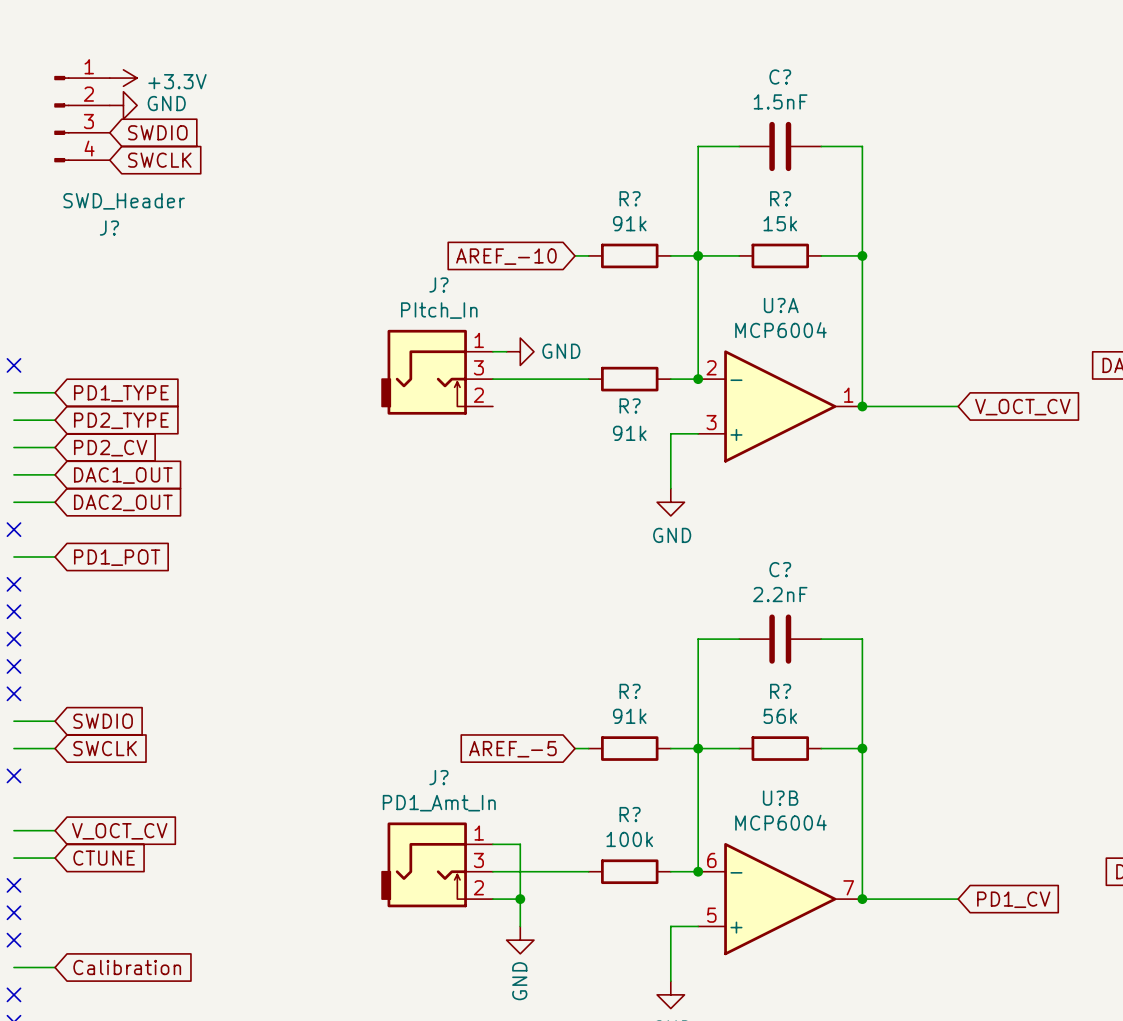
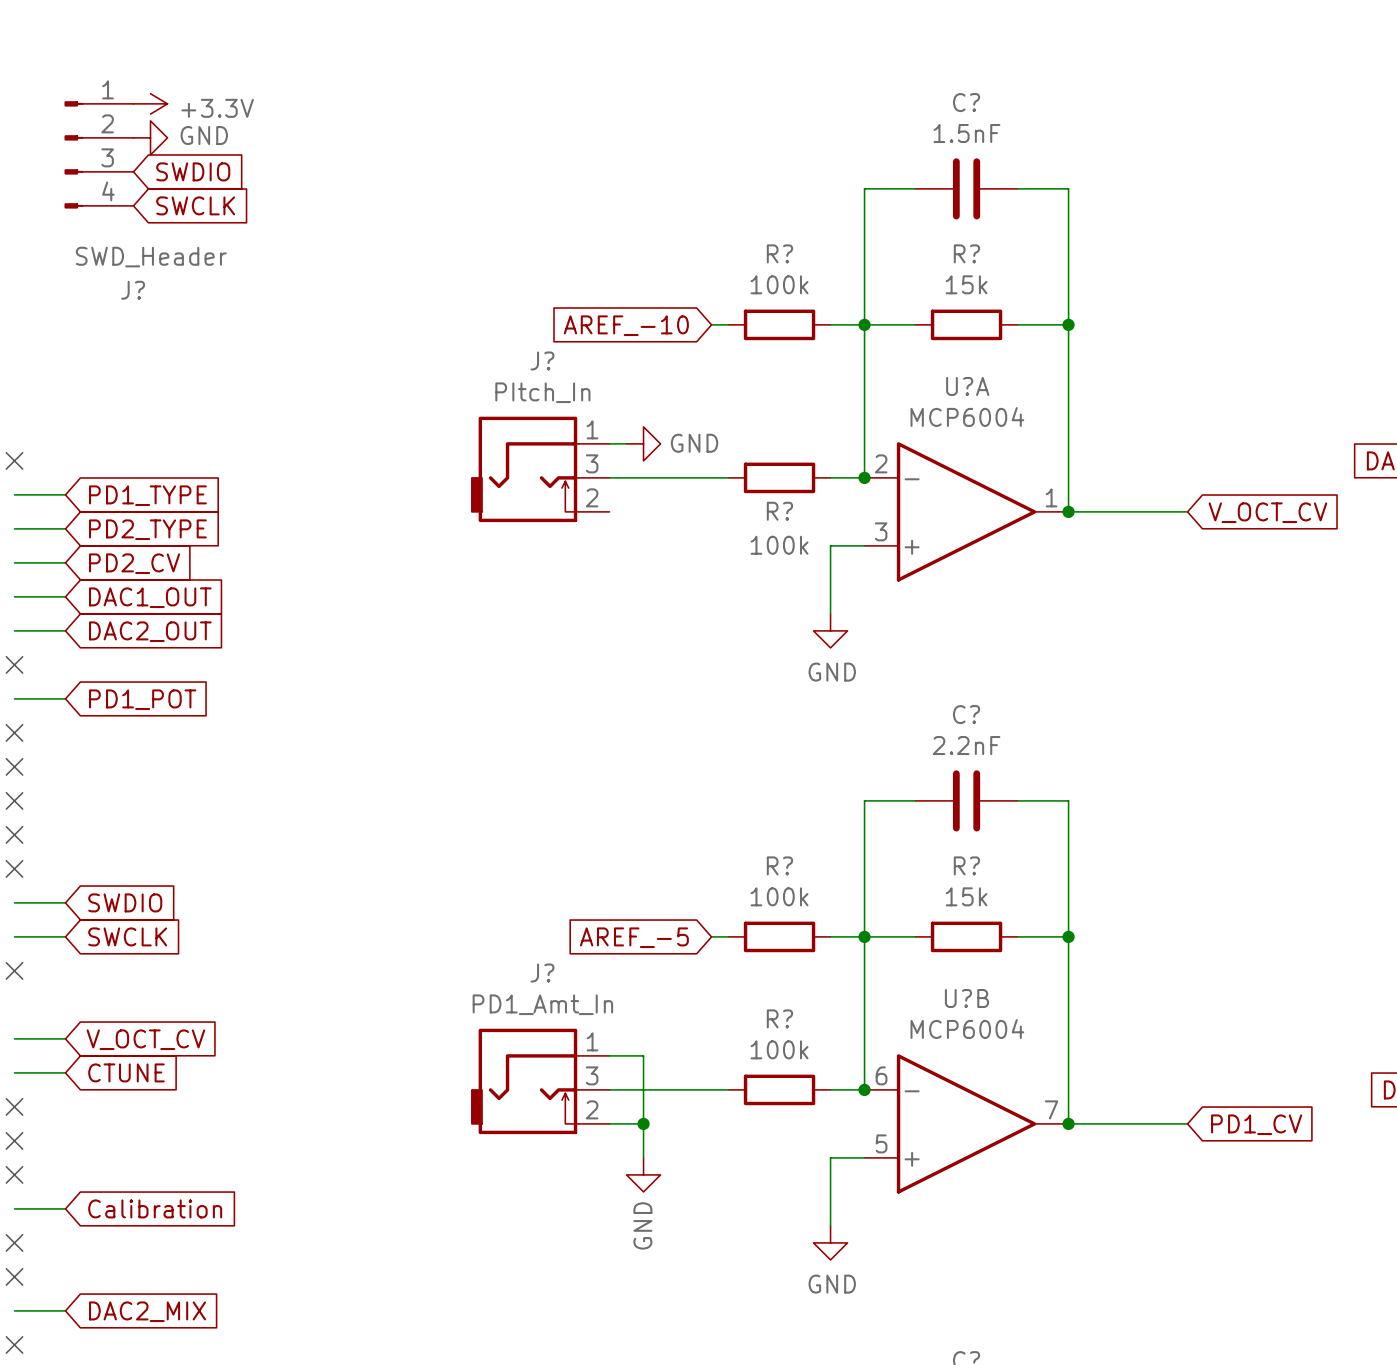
R? value: 91k (629, 223) -> 100k (779, 284)
R? value: 91k (629, 433) -> 100k (779, 545)
R? value: 91k (629, 716) -> 100k (779, 896)
R? value: 56k (780, 716) -> 15k (966, 896)

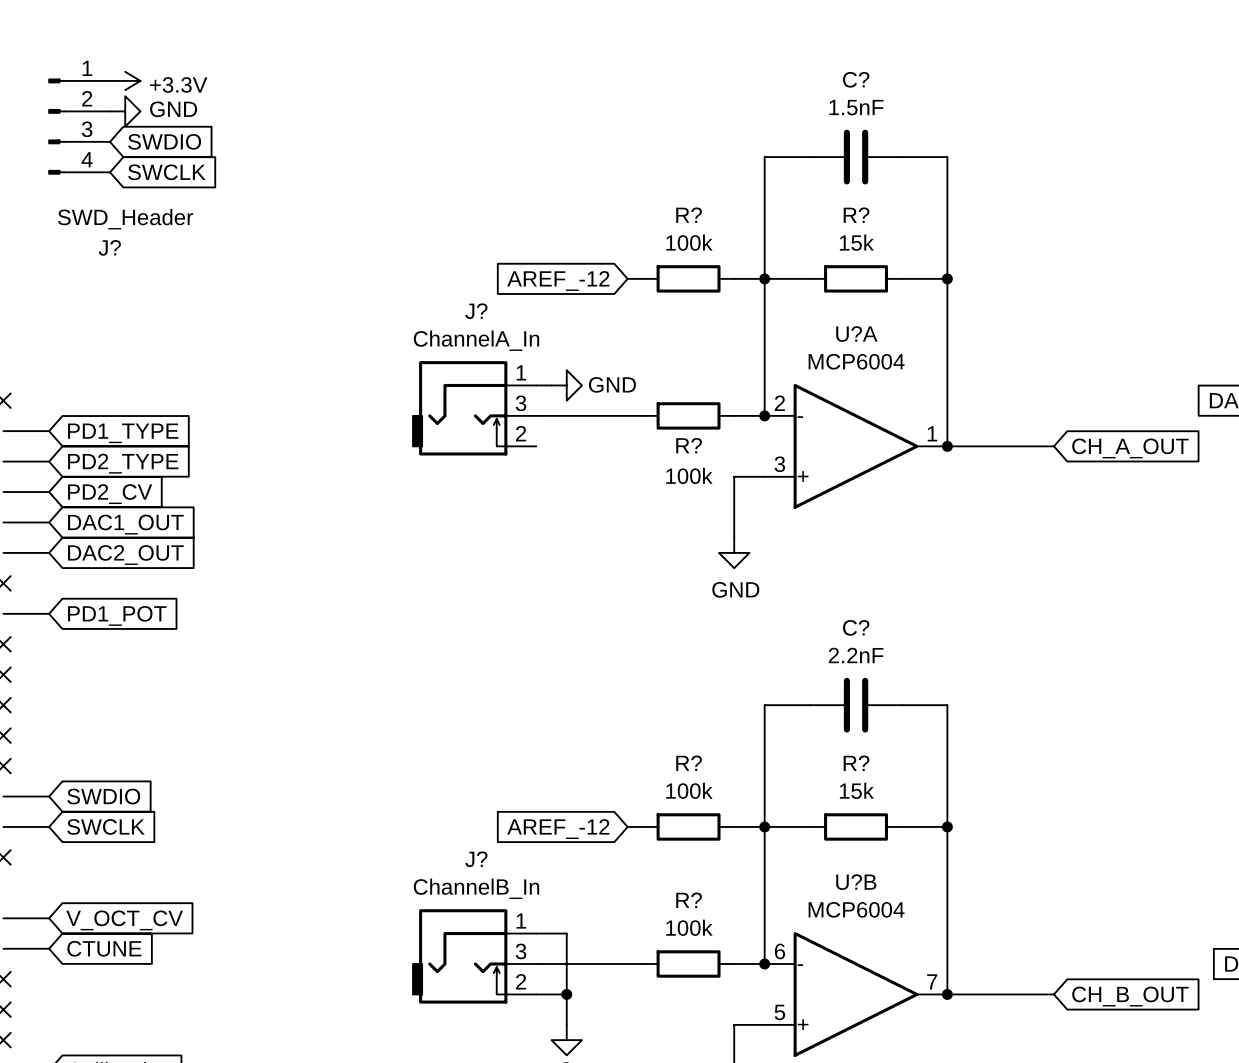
global label: AREF_-10 (626, 325) -> AREF_-12 (558, 280)
J? value: PItch_In (542, 392) -> ChannelA_In (476, 340)
global label: V_OCT_CV (1267, 512) -> CH_A_OUT (1130, 448)
global label: AREF_-5 (634, 937) -> AREF_-12 (558, 829)
J? value: PD1_Amt_In (542, 1004) -> ChannelB_In (476, 888)
global label: PD1_CV (1256, 1124) -> CH_B_OUT (1130, 996)

